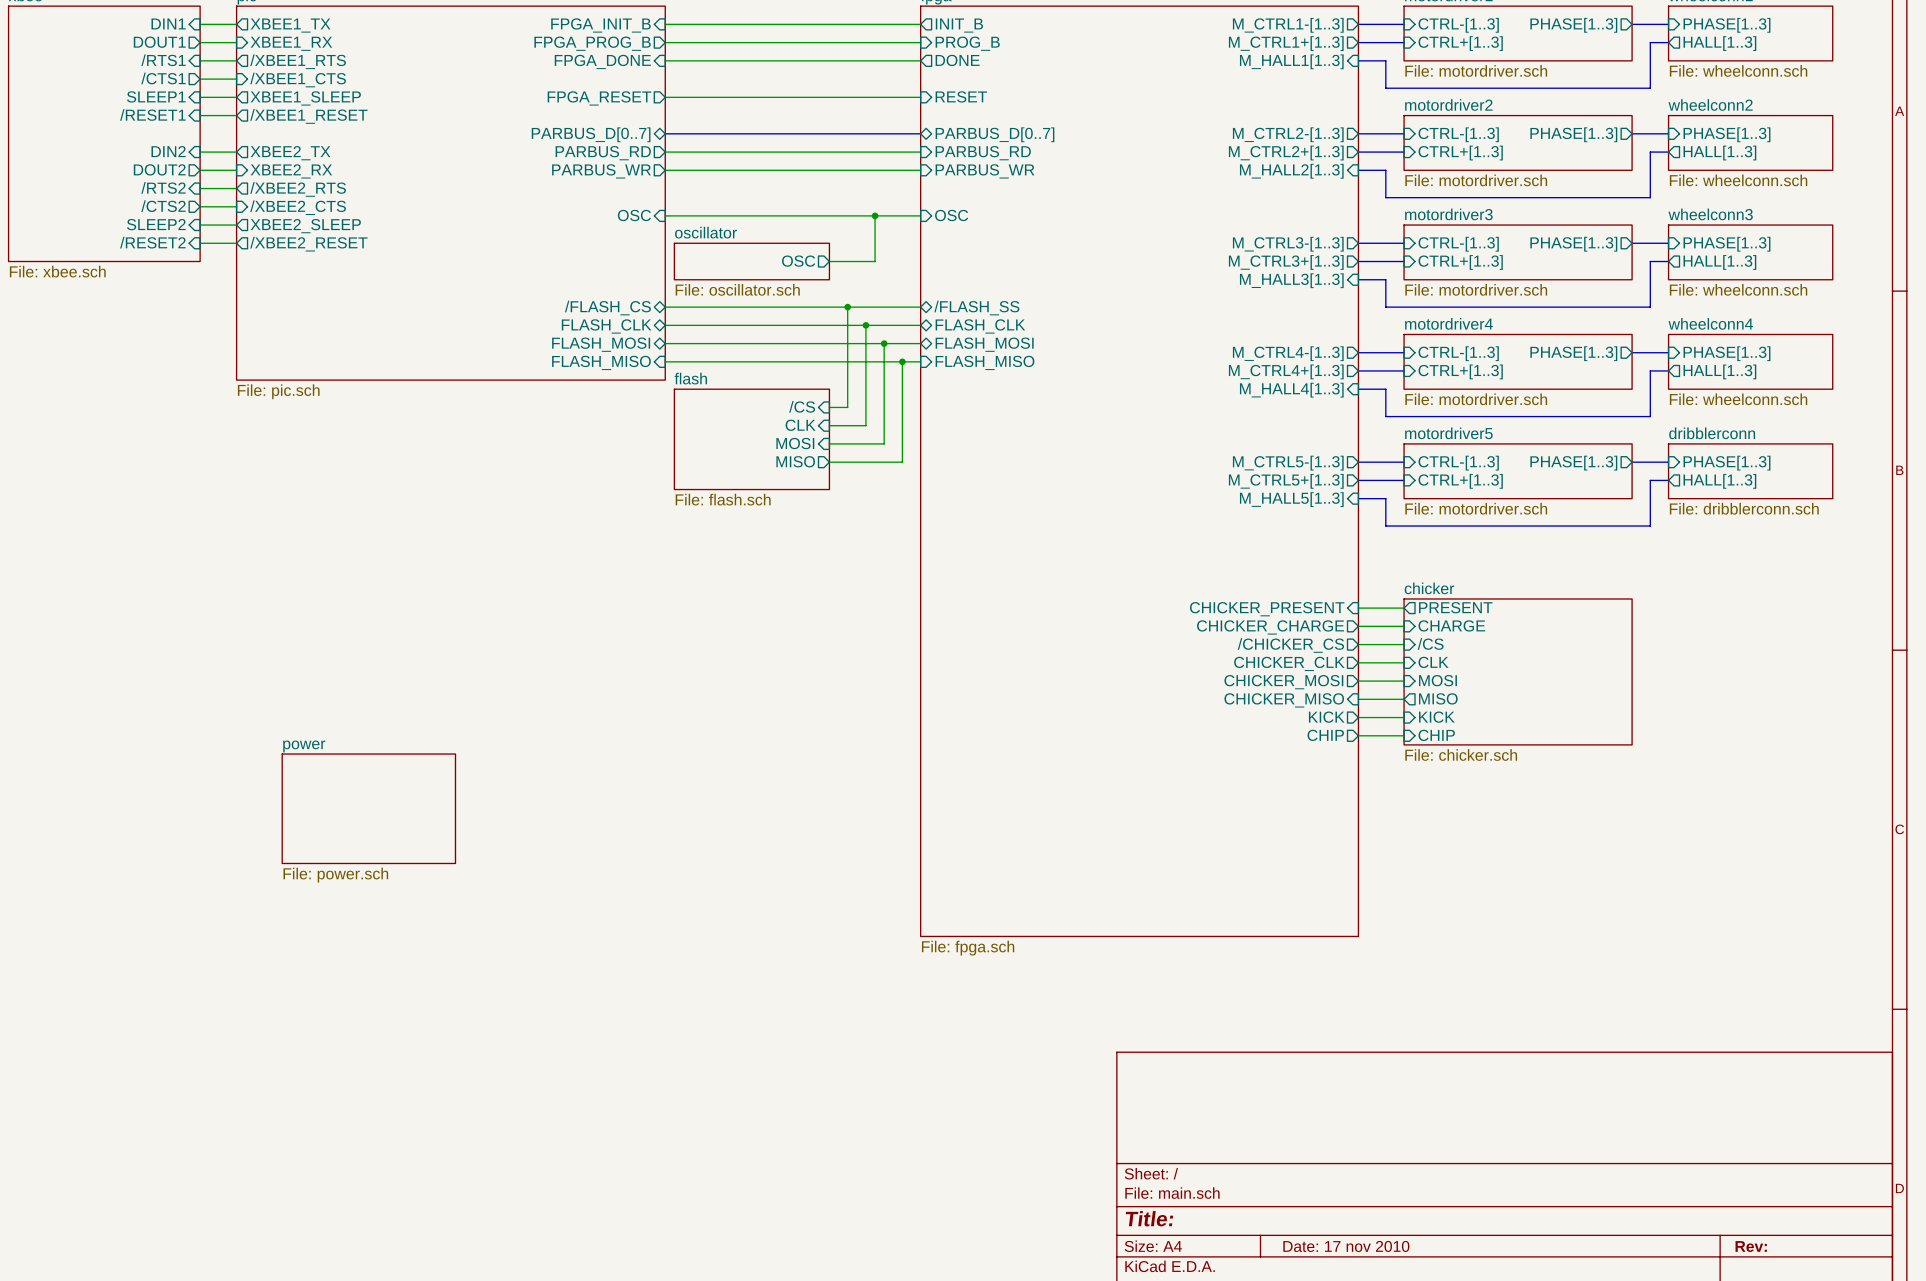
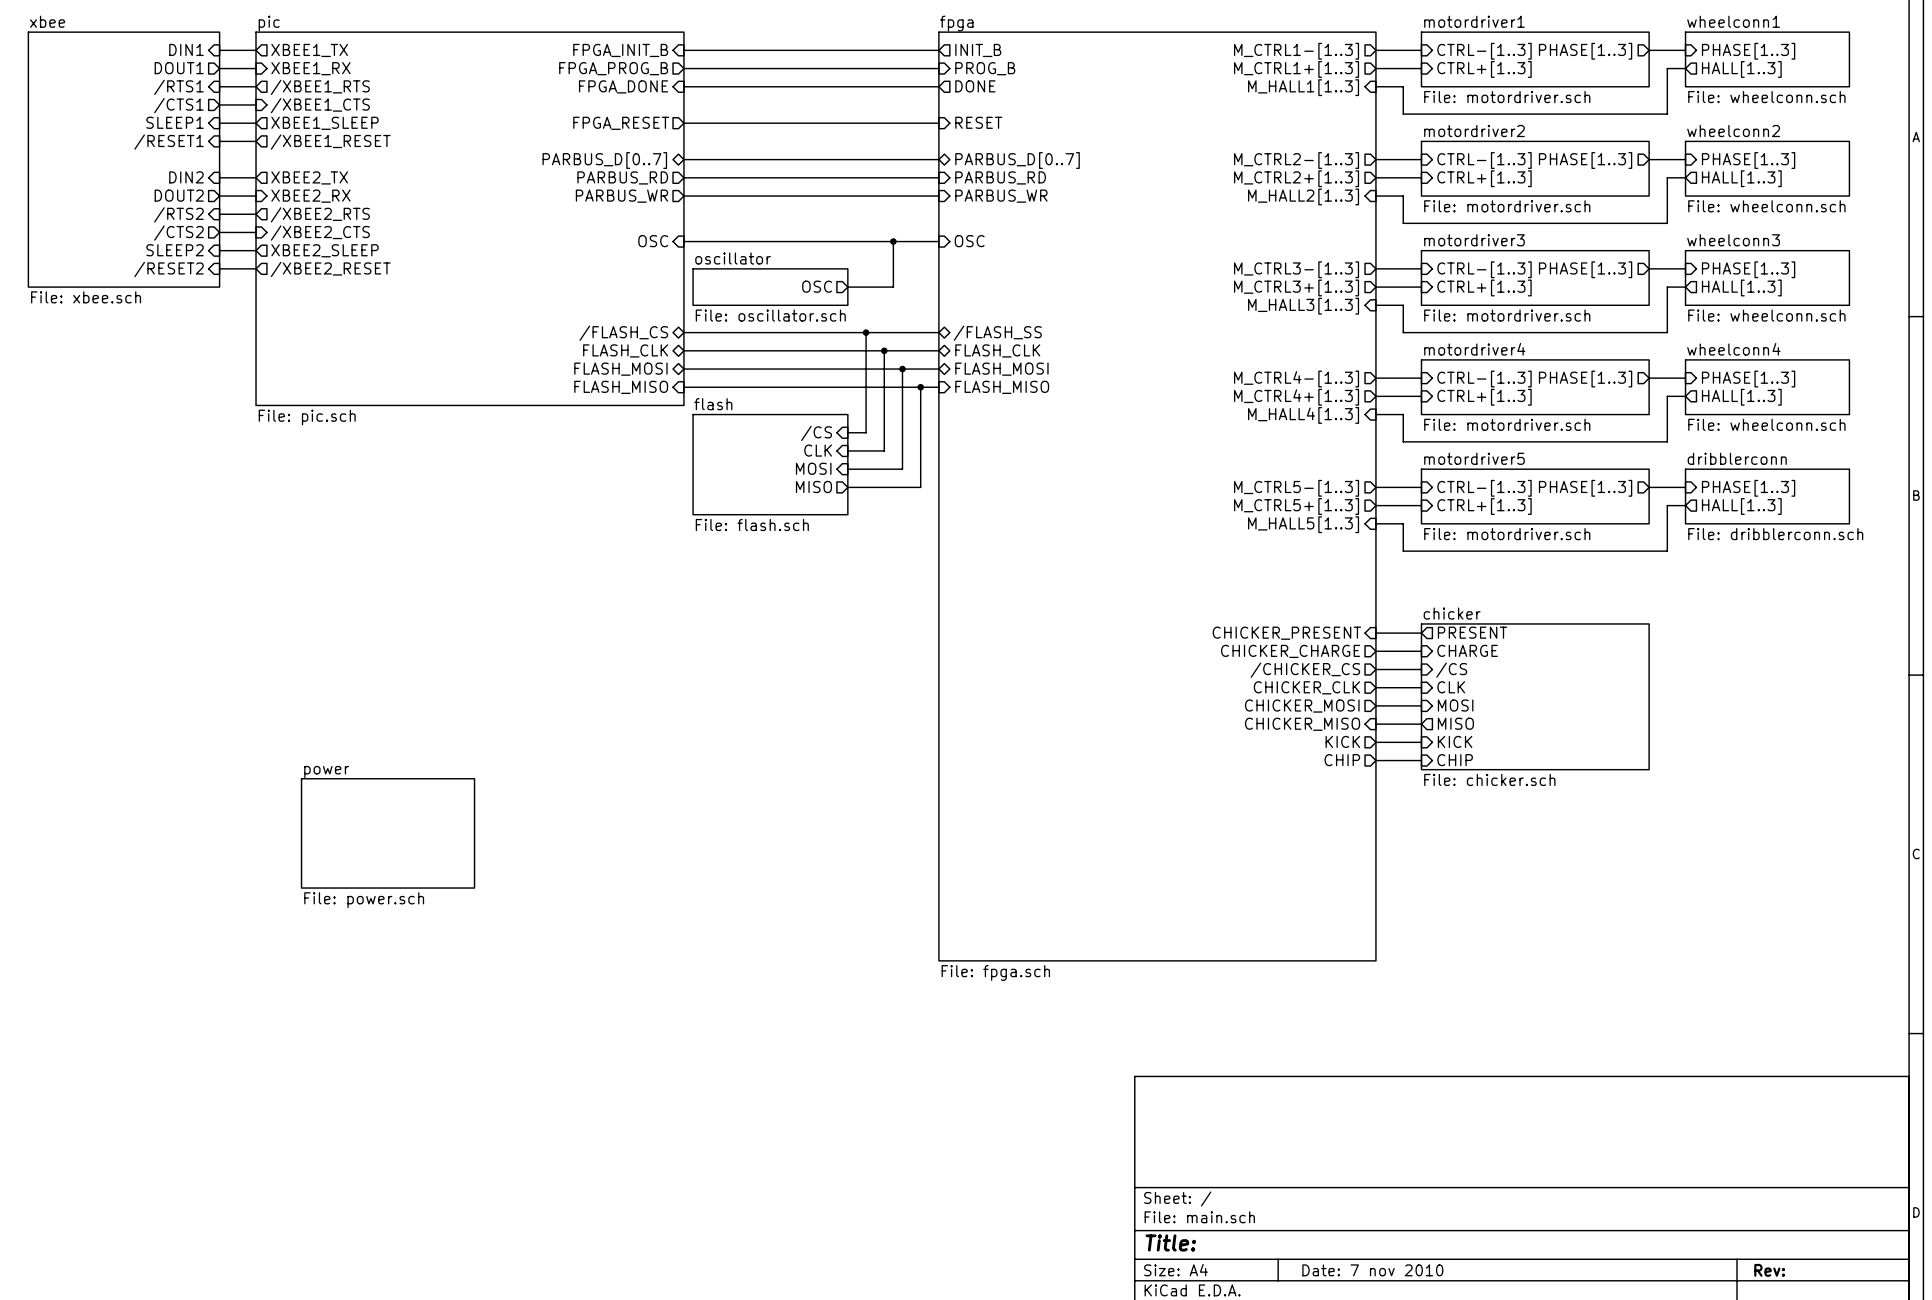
title block: Date: 17 nov 2010 (1346, 1246) -> Date: 7 nov 2010 (1372, 1270)

